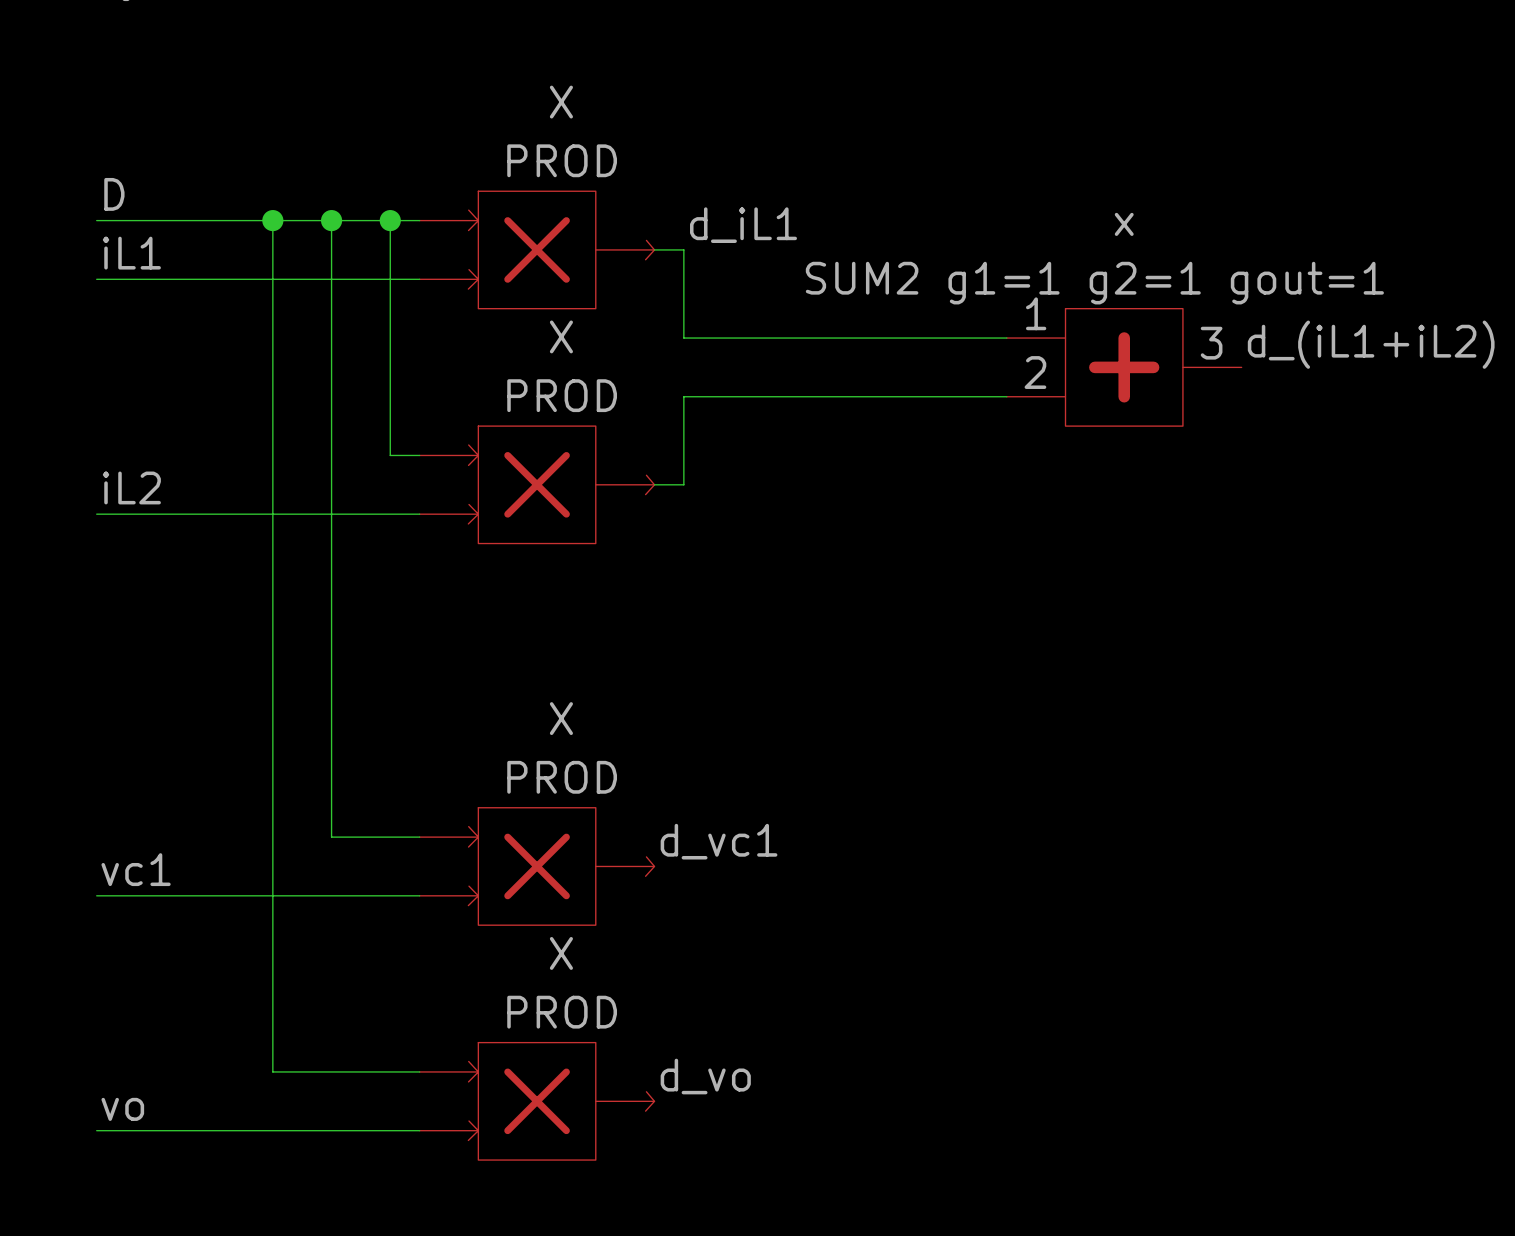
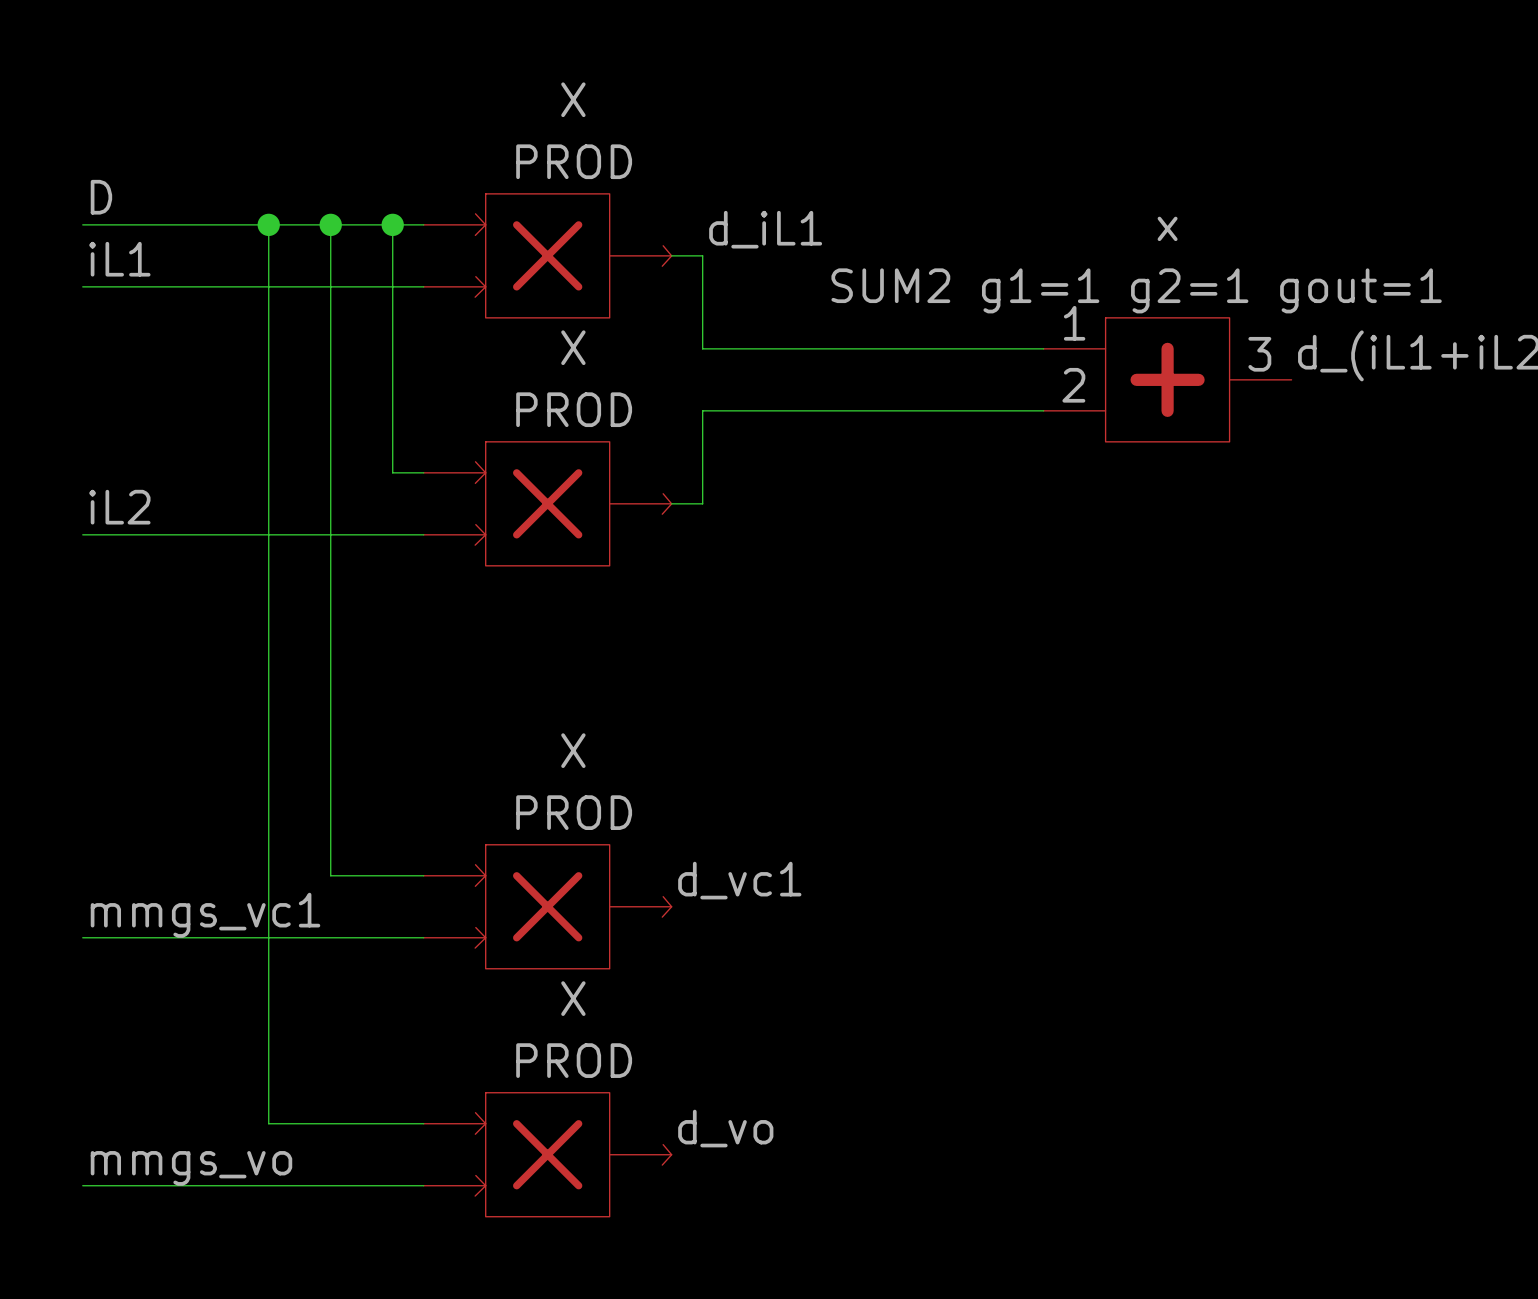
label: vc1 (136, 869) -> mmgs_vc1 (205, 915)
label: vo (122, 1109) -> mmgs_vo (191, 1168)

